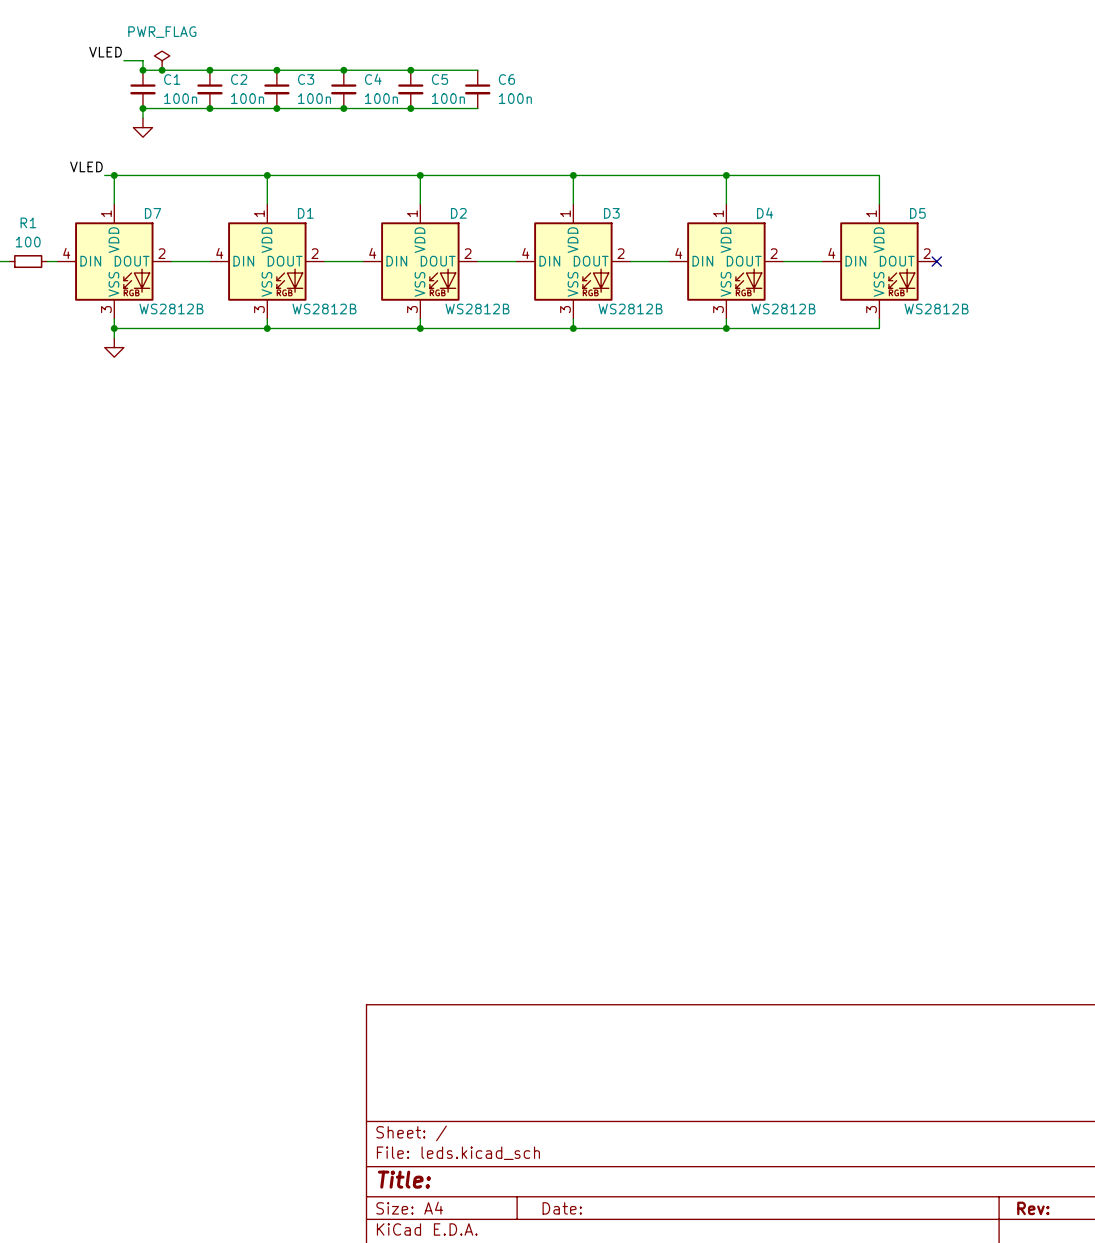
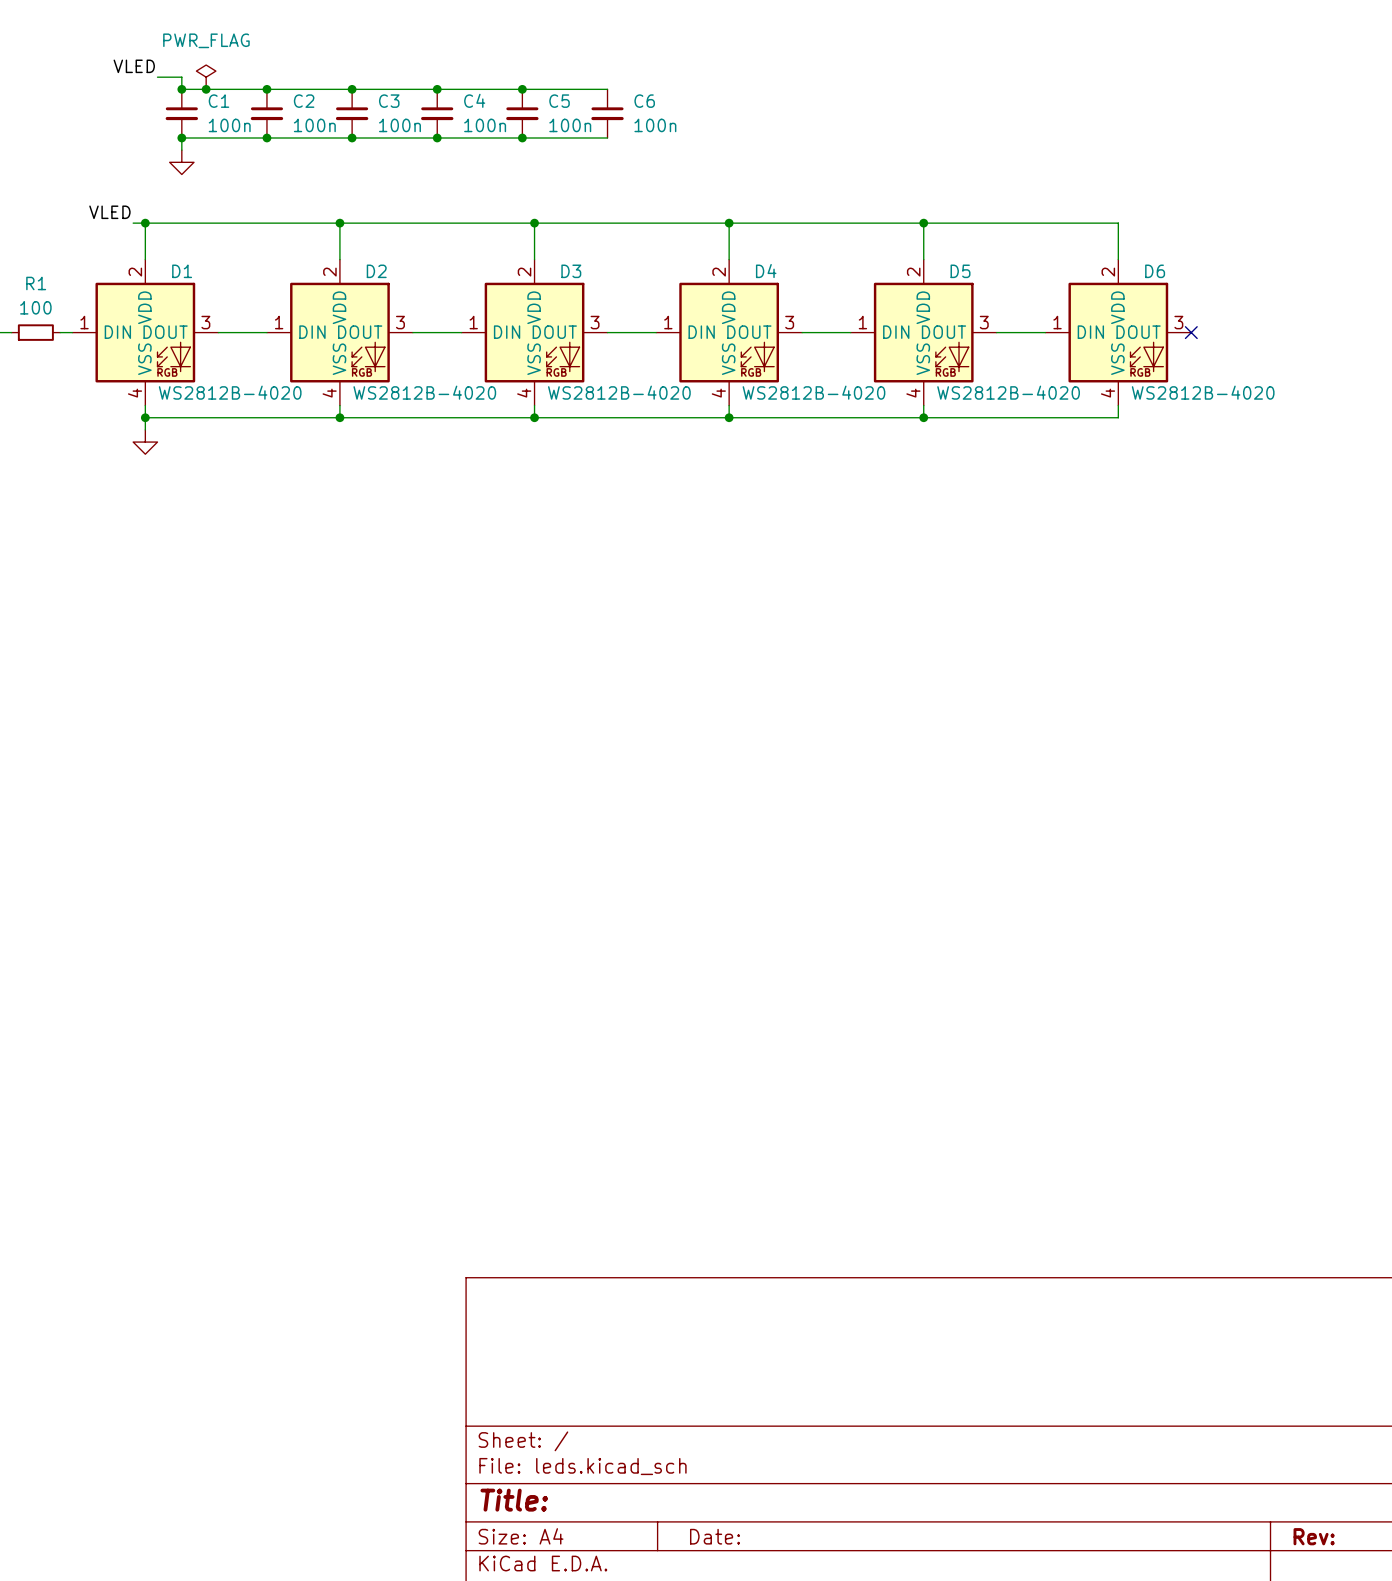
D1 pin number: 1 (259, 213) -> 2 (135, 272)
D1 name position: D1 (305, 213) -> D1 (182, 271)
D2 pin number: 1 (412, 213) -> 2 (329, 272)
D2 name position: D2 (458, 213) -> D2 (376, 271)
D3 pin number: 1 (565, 213) -> 2 (524, 272)
D3 name position: D3 (611, 213) -> D3 (571, 271)
D4 pin number: 1 (718, 213) -> 2 (719, 272)
D4 name position: D4 (765, 213) -> D4 (766, 271)
D5 pin number: 1 (871, 213) -> 2 (913, 272)
D5 name position: D5 (917, 213) -> D5 (960, 271)
D1 pin number: 4 (219, 253) -> 1 (84, 322)
D1 pin number: 2 (314, 253) -> 3 (205, 322)
D2 pin number: 4 (372, 253) -> 1 (279, 322)
D2 pin number: 2 (467, 253) -> 3 (400, 322)
D3 pin number: 4 (525, 253) -> 1 (473, 322)
D3 pin number: 2 (620, 253) -> 3 (595, 322)
D4 pin number: 4 (678, 253) -> 1 (668, 322)
D4 pin number: 2 (773, 253) -> 3 (789, 322)
D5 pin number: 4 (831, 253) -> 1 (862, 322)
D5 pin number: 2 (927, 253) -> 3 (984, 322)
D7: WS2812B (114, 261) -> none
D1 position: (267, 261) -> (145, 332)
D2 position: (420, 261) -> (339, 332)
D3 position: (573, 261) -> (534, 332)
D4 position: (726, 261) -> (729, 332)
D5 position: (879, 261) -> (923, 332)
D6: none -> WS2812B-4020 (1118, 332)
D1 pin number: 3 (259, 309) -> 4 (135, 393)
D1 value: WS2812B (324, 309) -> WS2812B-4020 (230, 392)
D2 pin number: 3 (412, 309) -> 4 (329, 393)
D2 value: WS2812B (477, 309) -> WS2812B-4020 (424, 392)
D3 pin number: 3 (565, 309) -> 4 (524, 393)
D3 value: WS2812B (630, 309) -> WS2812B-4020 (619, 392)
D4 pin number: 3 (718, 309) -> 4 (718, 393)
D4 value: WS2812B (783, 309) -> WS2812B-4020 (813, 392)
D5 pin number: 3 (871, 309) -> 4 (913, 393)
D5 value: WS2812B (936, 309) -> WS2812B-4020 (1008, 392)

